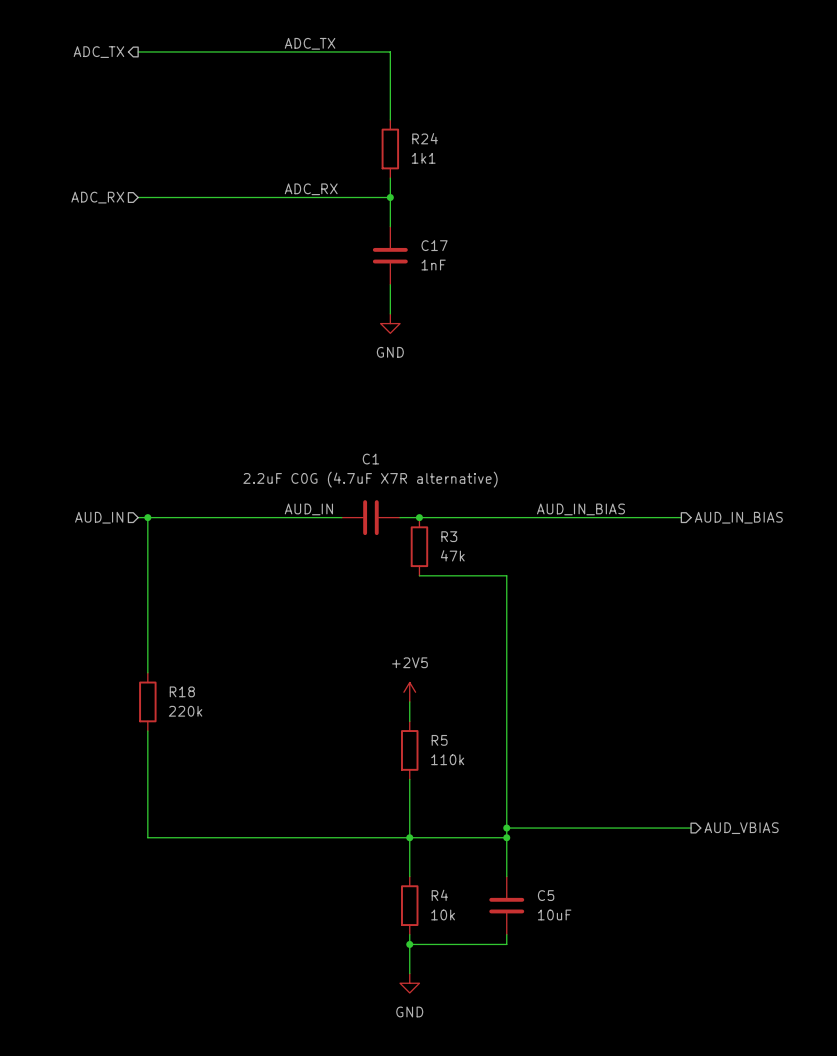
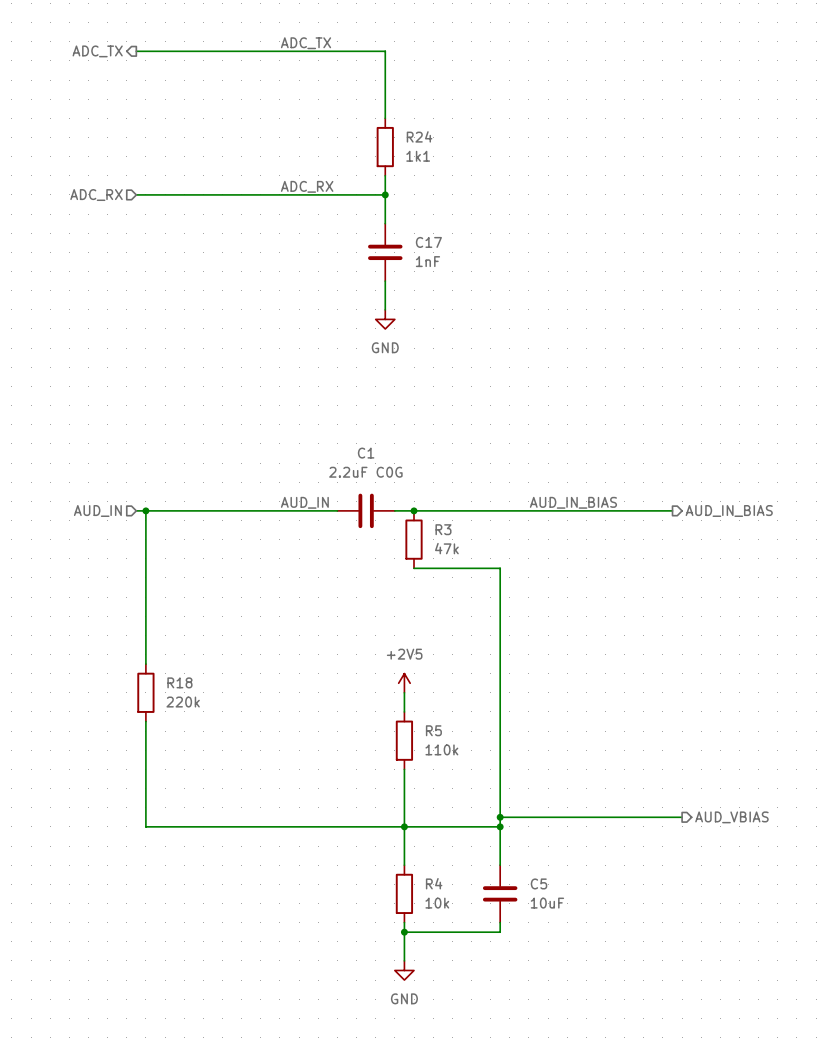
C1 value: 2.2uF C0G (4.7uF X7R alternative) (370, 479) -> 2.2uF C0G (365, 472)

